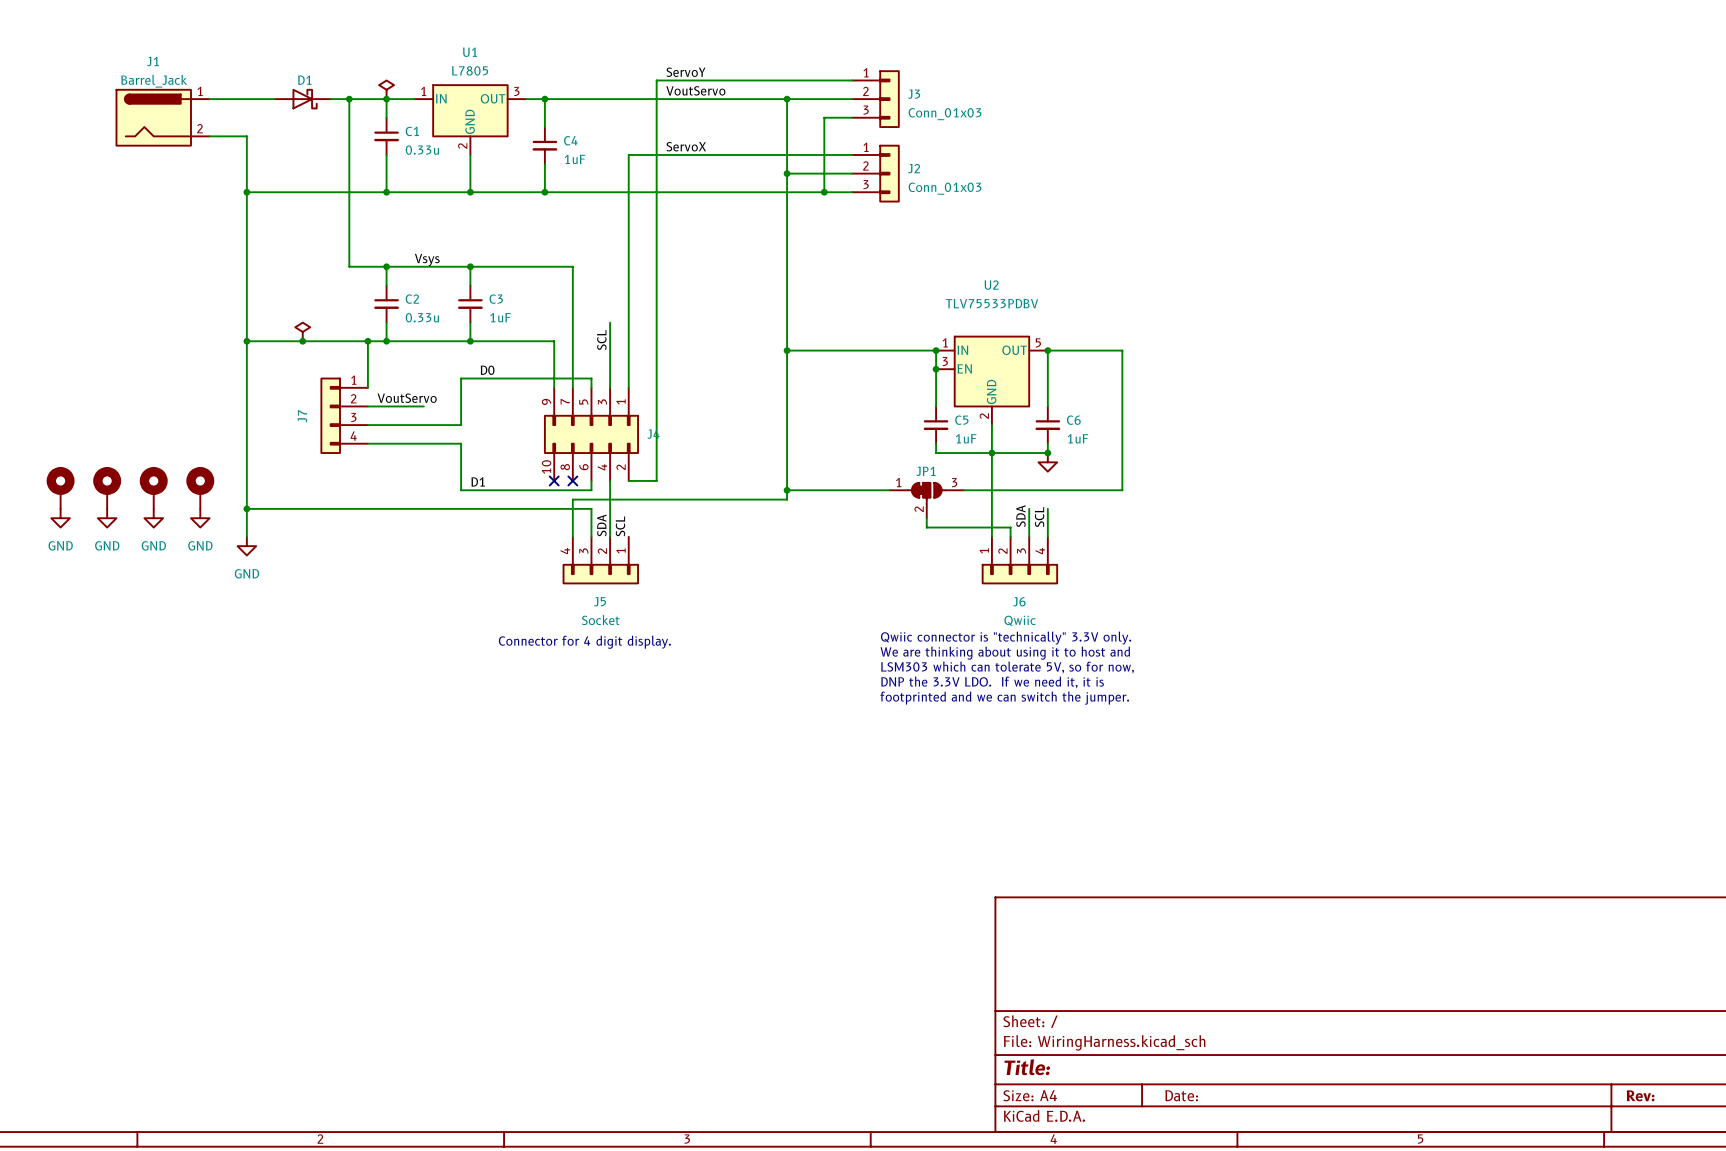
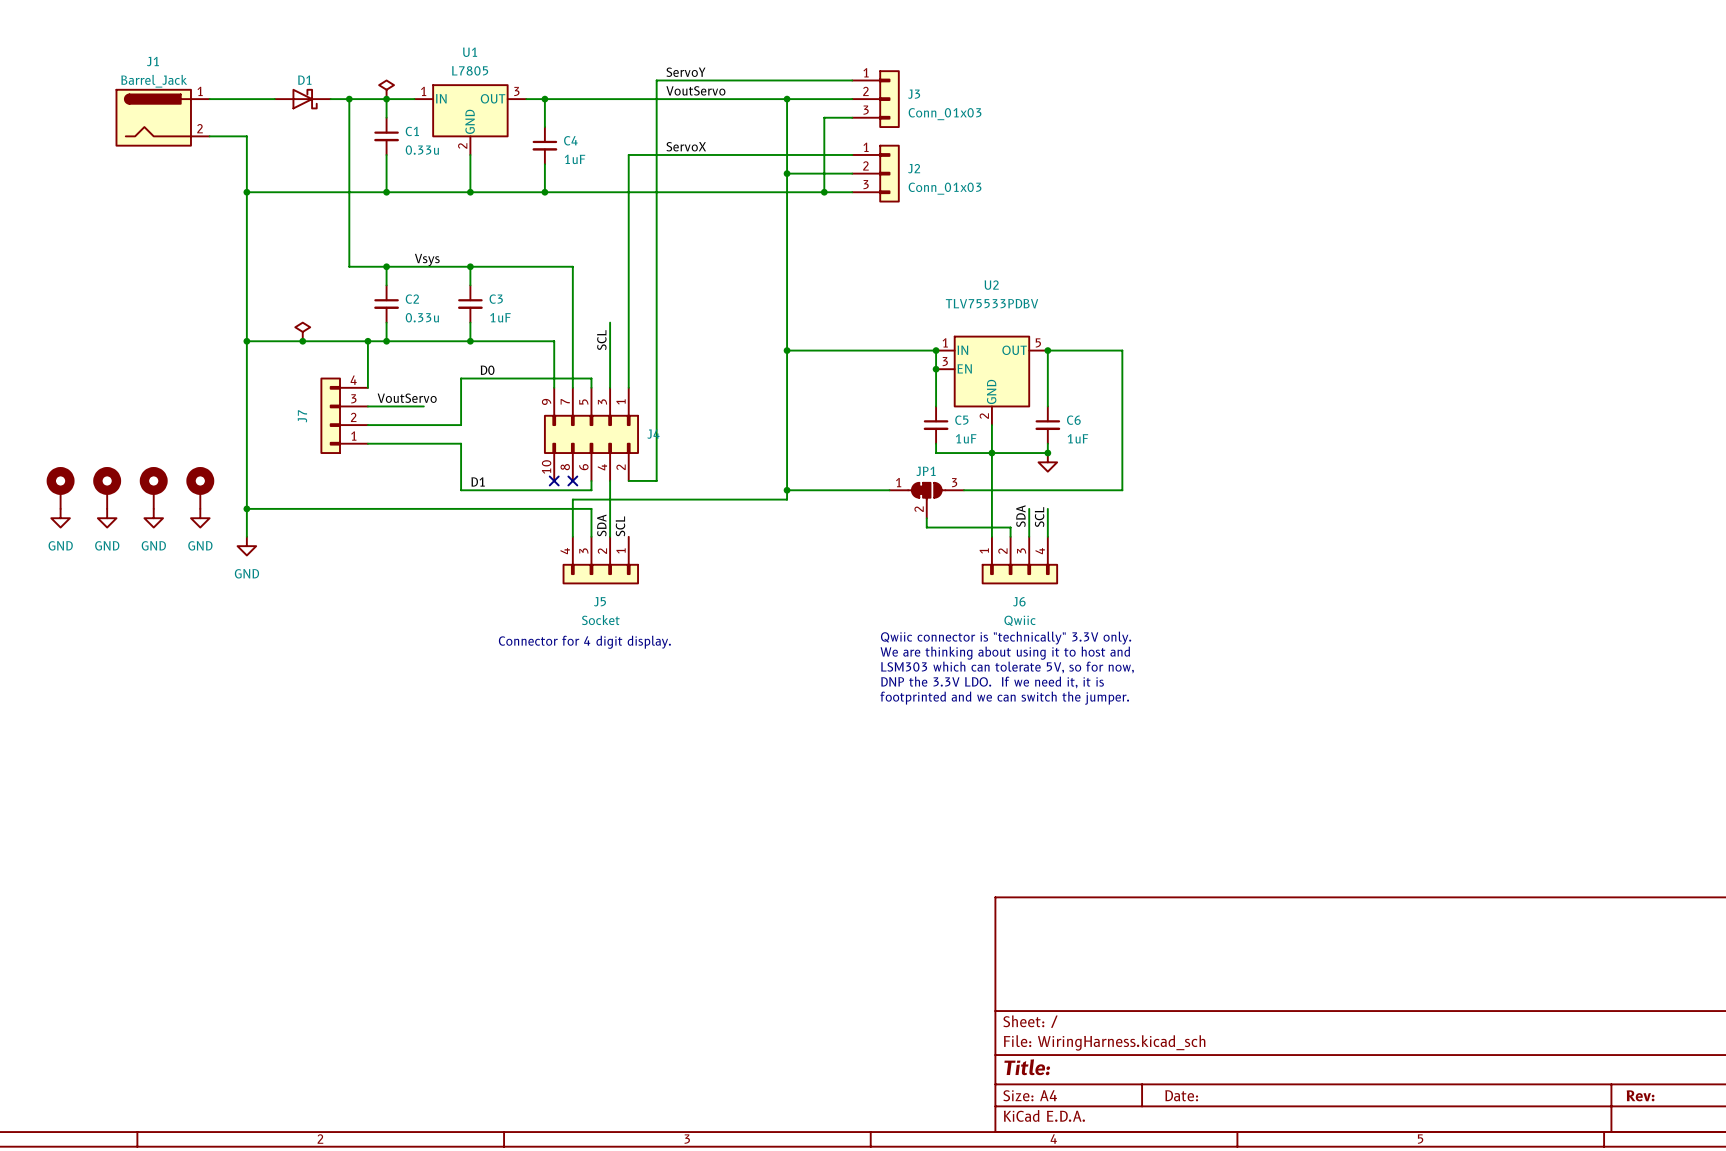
J7 flip: as is (330, 415) -> up-down (330, 415)

